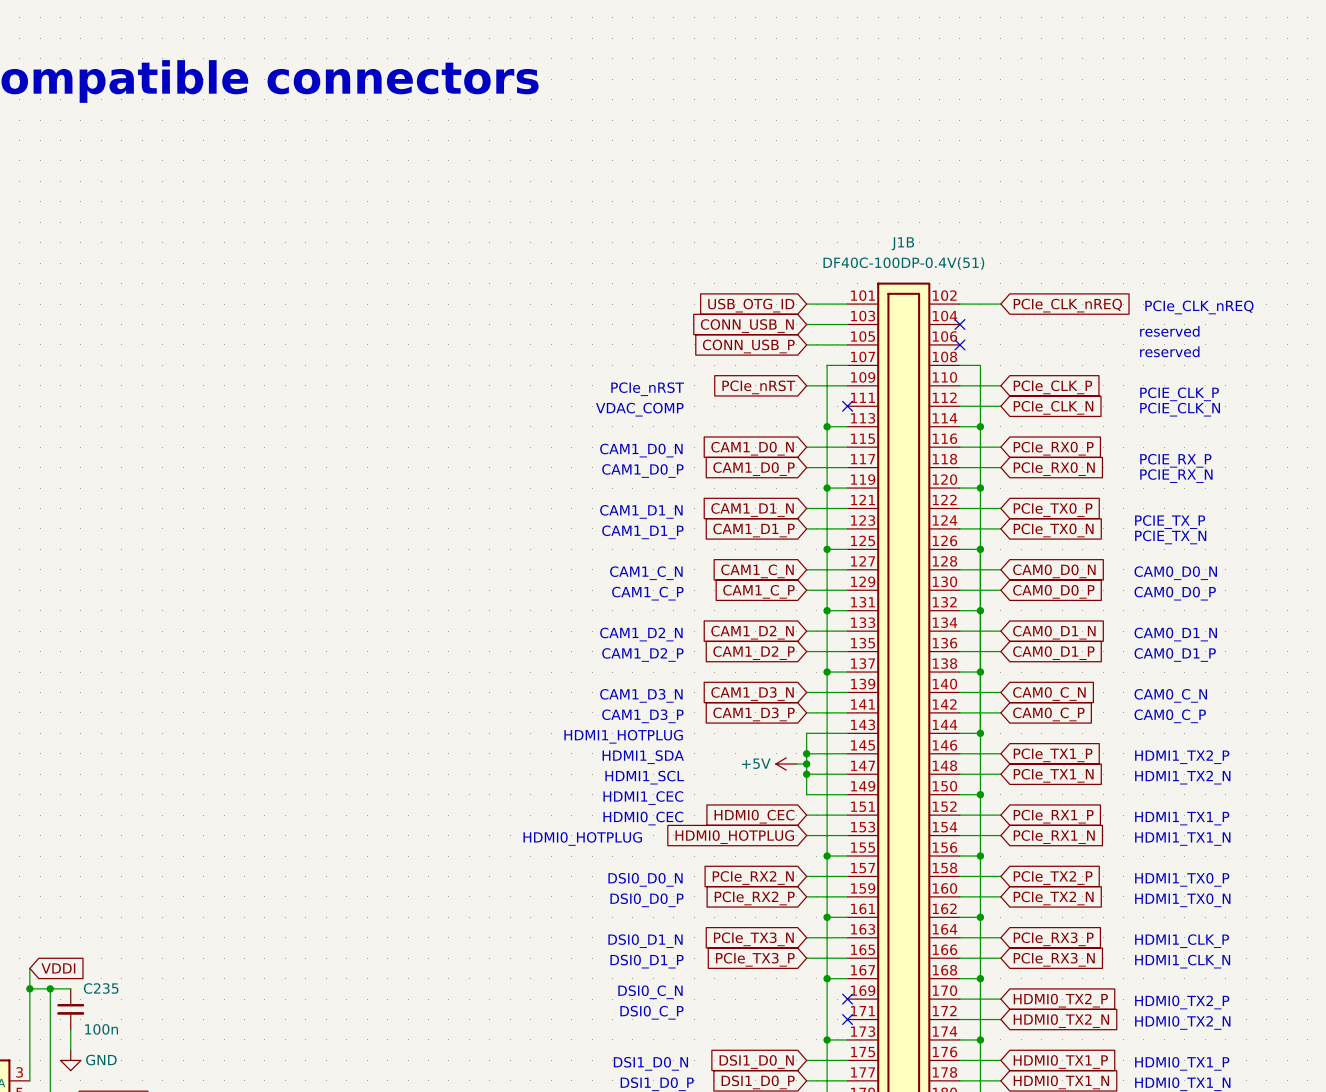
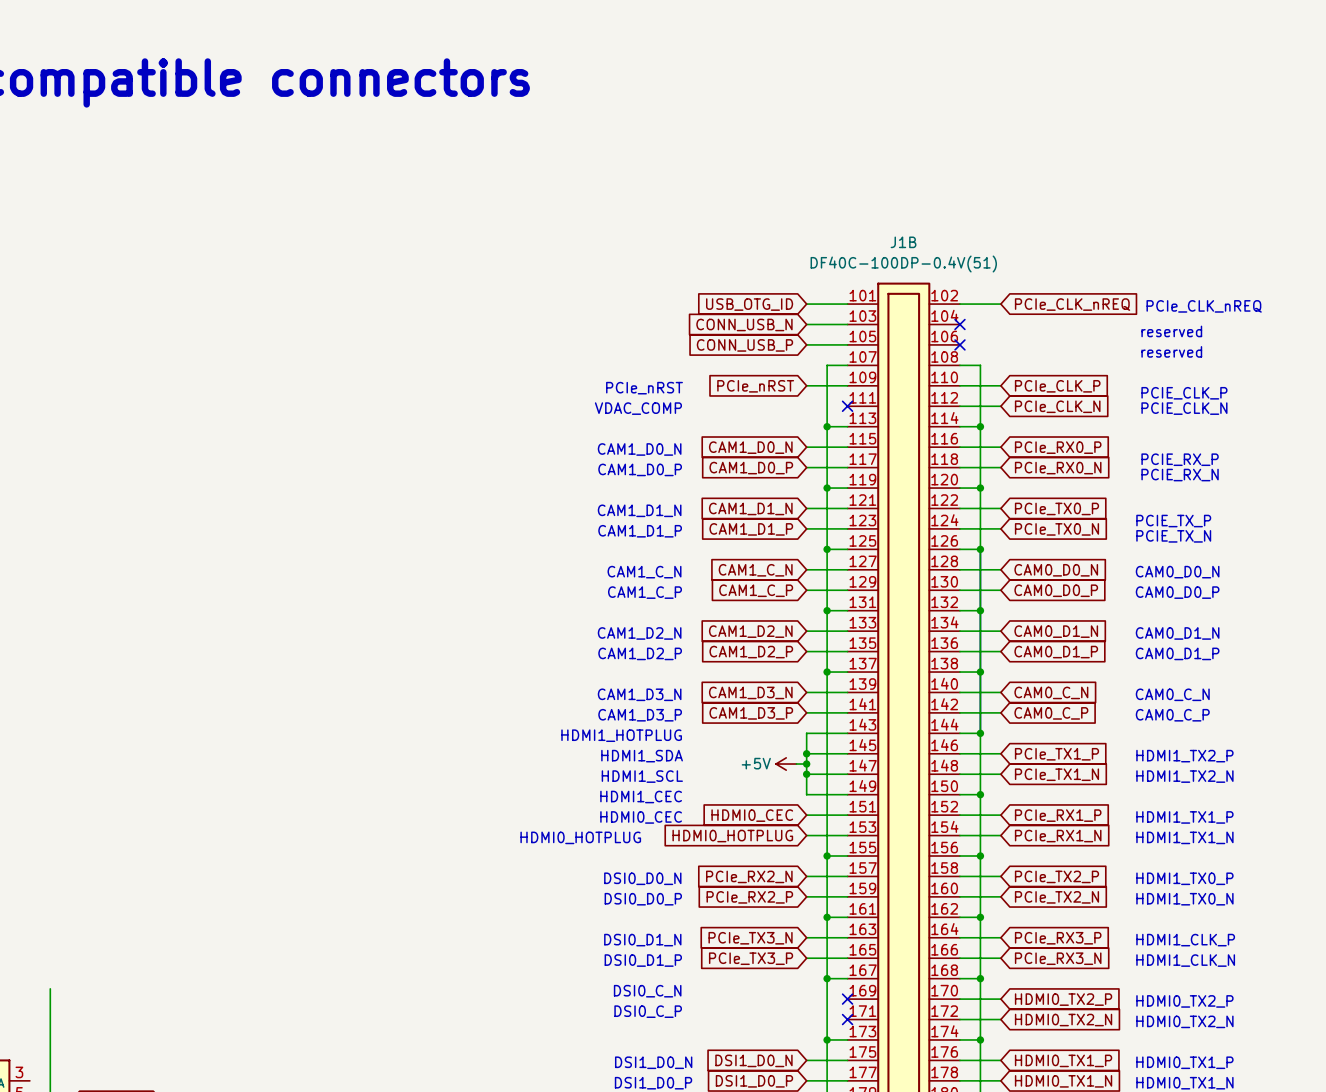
wire: (29, 968) (29, 1080) -> none
global label: VDDI (58, 968) -> none
wire: (29, 988) (70, 988) -> none
junction: (29, 988) -> none
junction: (50, 988) -> none
C235: (70, 1009) -> none
wire: (70, 1029) (70, 1050) -> none
power symbol: GND (70, 1060) -> none

